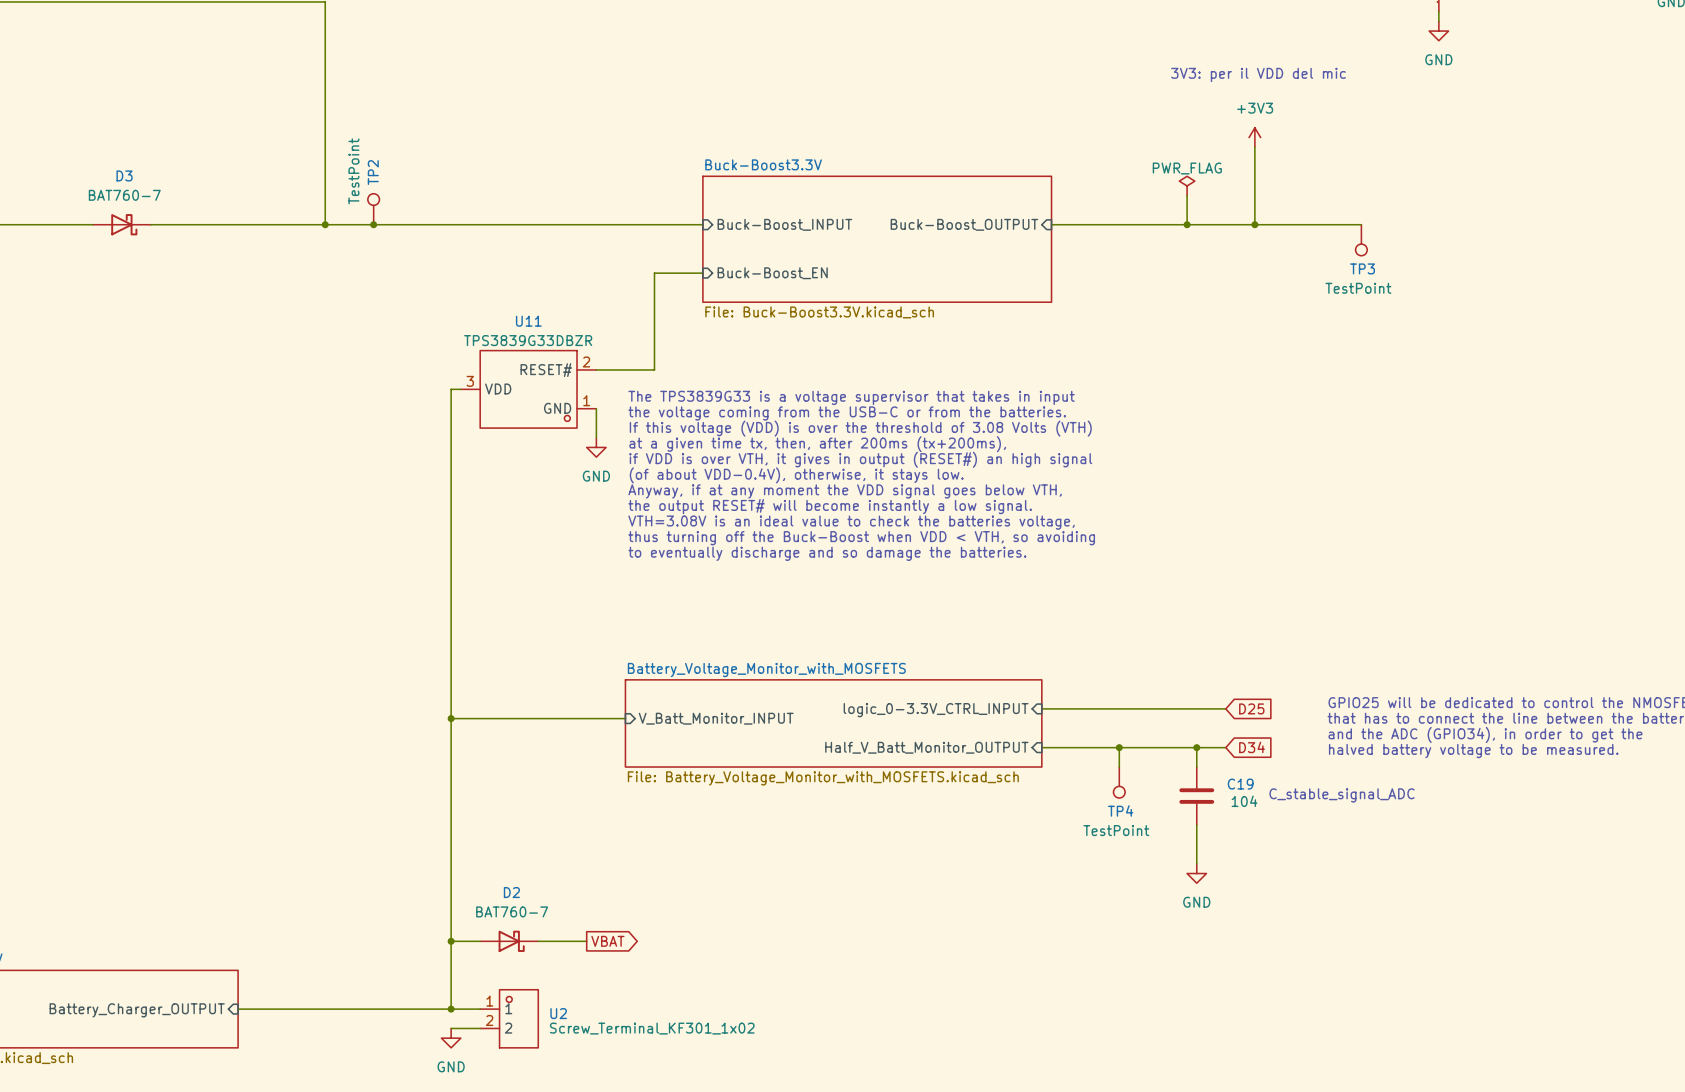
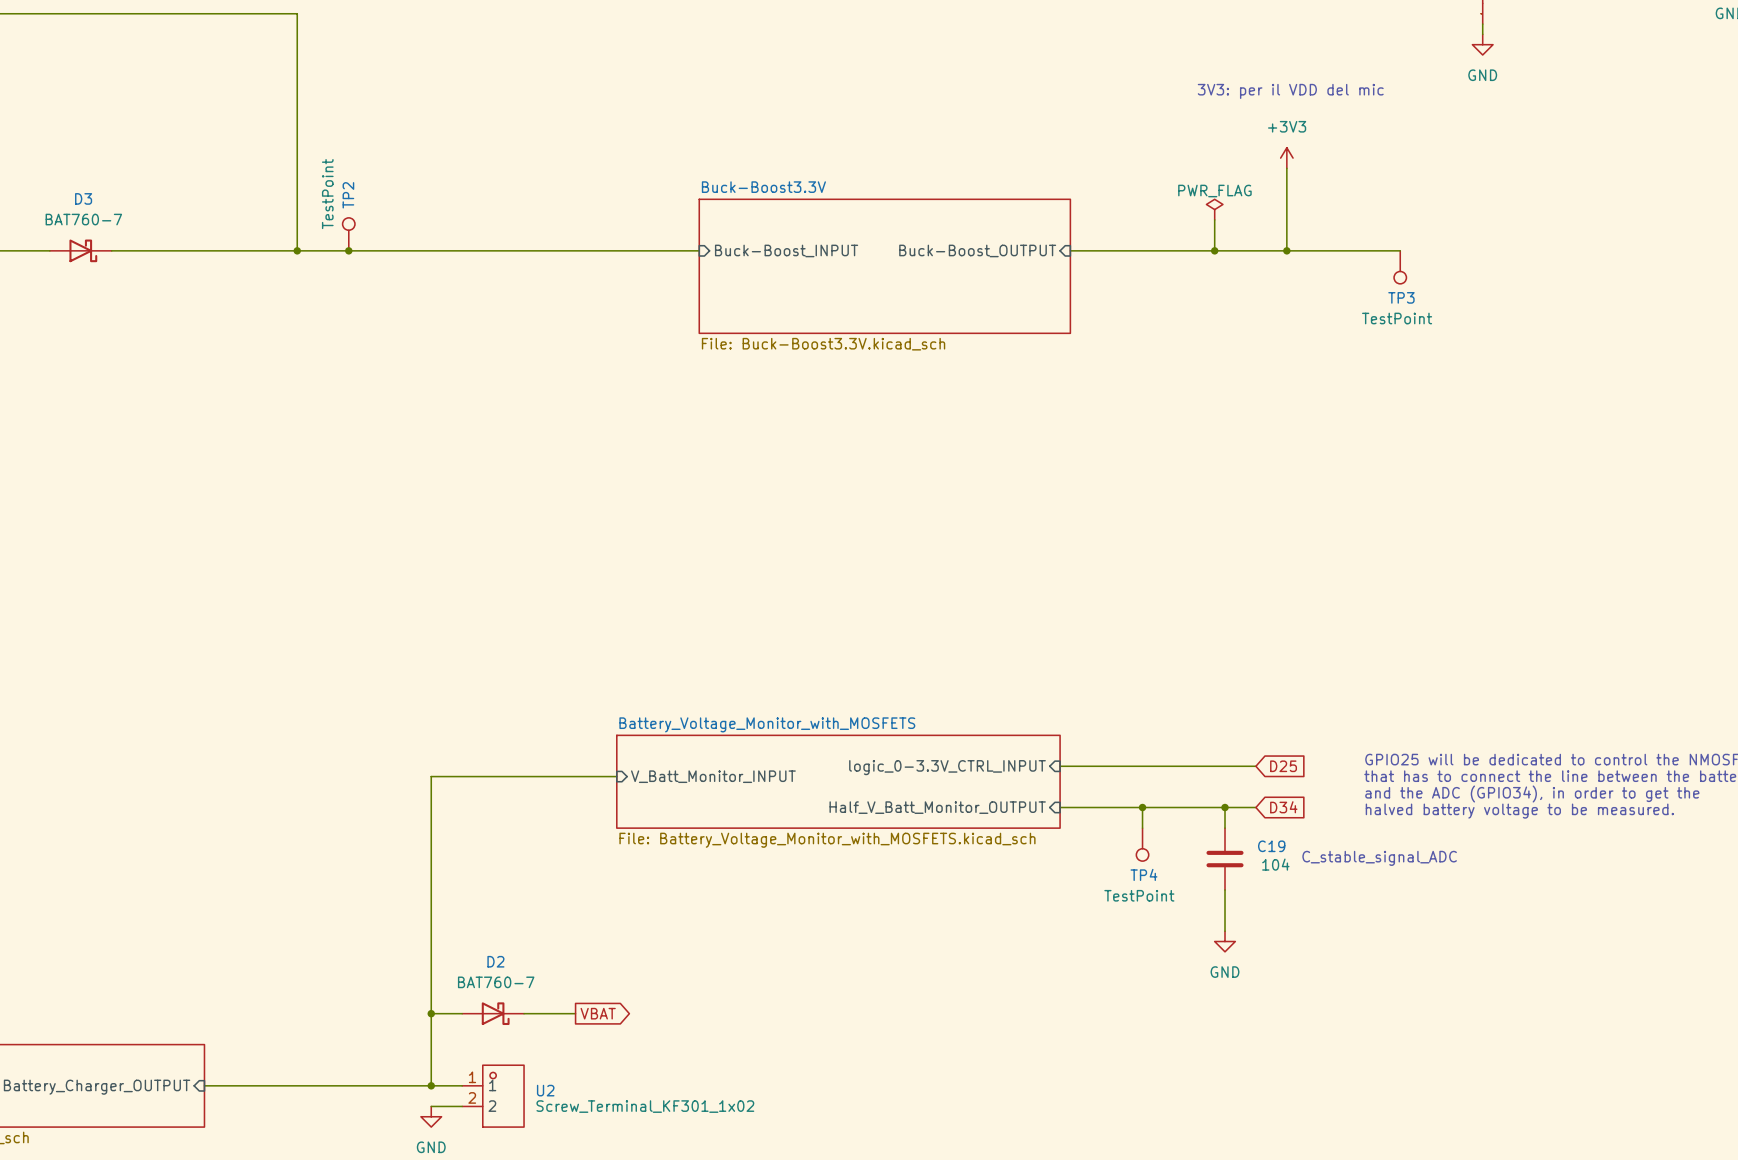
wire: (702, 273) (654, 273) (654, 369) (596, 369) -> none
sheet pin: Buck-Boost_EN (772, 273) -> none
wire: (460, 389) (451, 389) (451, 718) -> none
U11: TPS3839G33DBZR (528, 389) -> none
text: The TPS3839G33 is a voltage supervisor that takes in input (851, 397) -> none
wire: (596, 408) (596, 437) -> none
text: the voltage coming from the USB-C or from the batteries. (847, 413) -> none
text: If this voltage (VDD) is over the threshold of 3.08 Volts (VTH) (860, 428) -> none
text: at a given time tx, then, after 200ms (tx+200ms), (817, 444) -> none
power symbol: GND (596, 447) -> none
text: if VDD is over VTH, it gives in output (RESET#) an high signal (860, 459) -> none
text: (of about VDD-0.4V), otherwise, it stays low. (796, 475) -> none
text: Anyway, if at any moment the VDD signal goes below VTH, (845, 491) -> none
text: the output RESET# will become instantly a low signal. (830, 506) -> none
text: VTH=3.08V is an ideal value to check the batteries voltage, (851, 522) -> none
text: thus turning off the Buck-Boost when VDD < VTH, so avoiding (861, 538) -> none
text: to eventually discharge and so damage the batteries. (827, 553) -> none
junction: (451, 718) -> none

